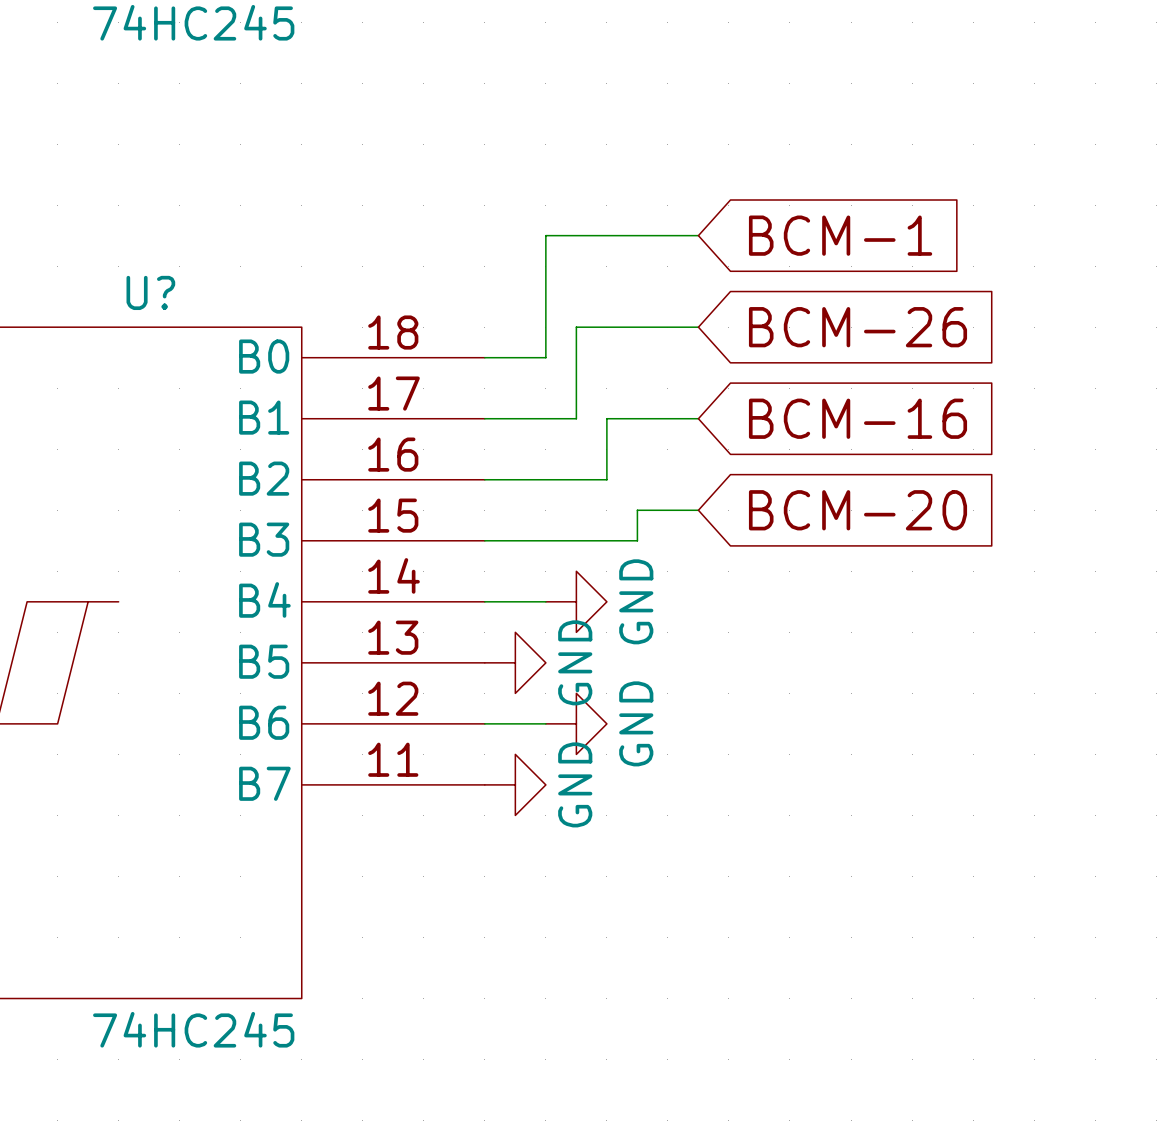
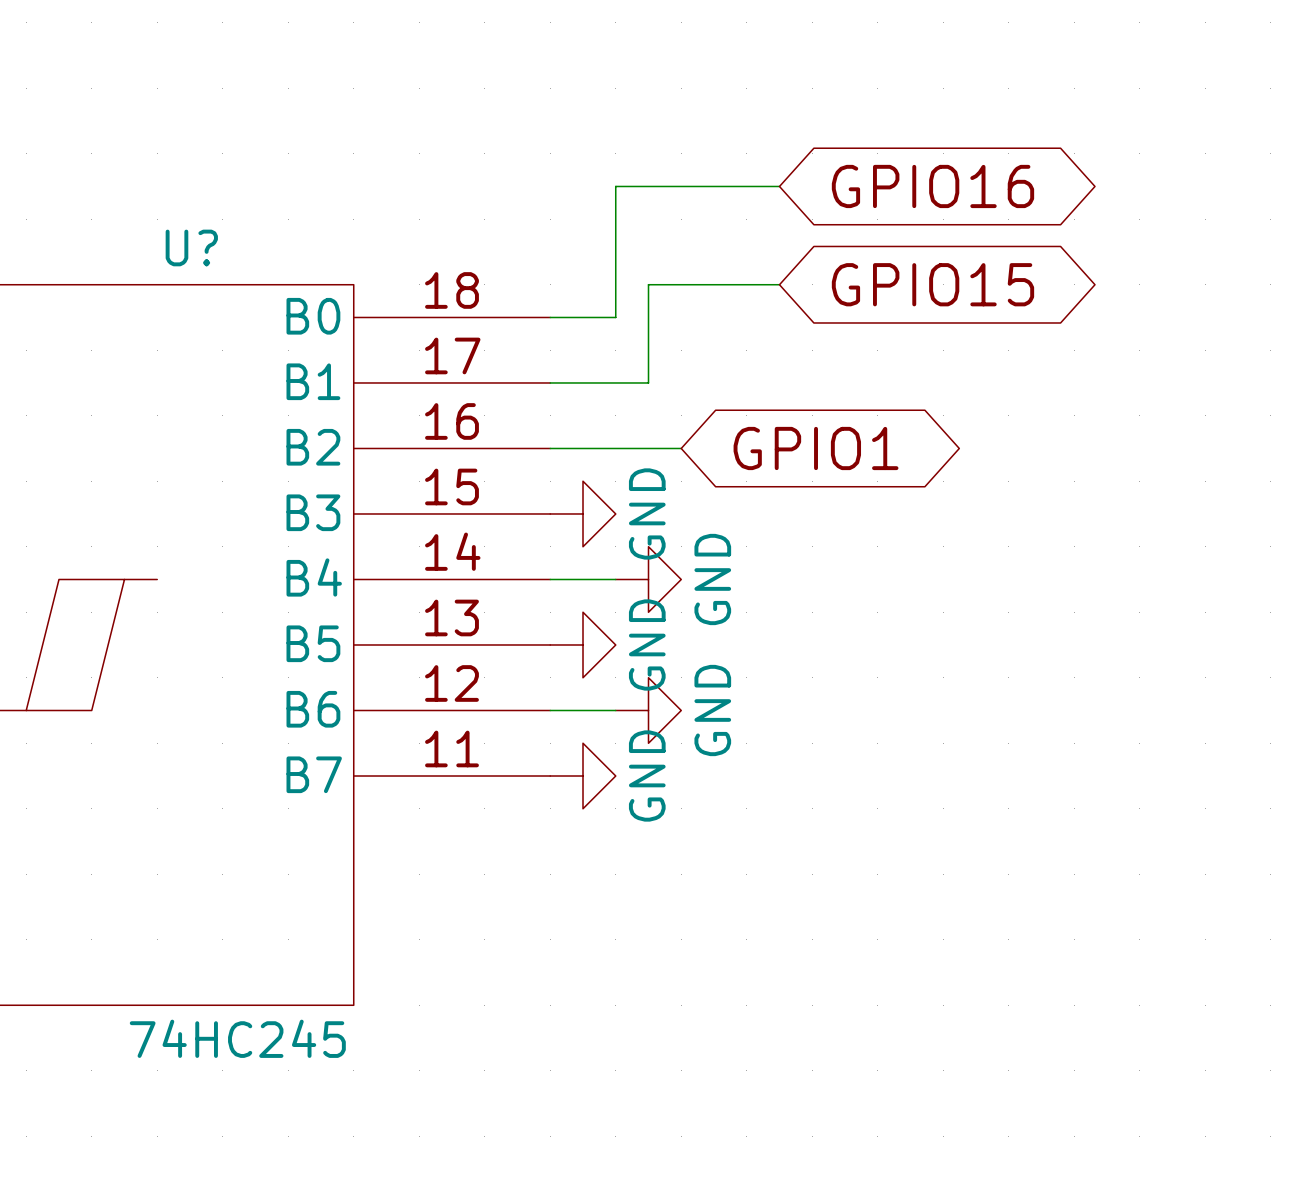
global label shape: input (840, 235) -> bidirectional (932, 186)
global label: BCM-1 (840, 235) -> GPIO16 (932, 186)
global label shape: input (858, 327) -> bidirectional (932, 284)
global label: BCM-26 (858, 327) -> GPIO15 (932, 284)
wire: (698, 418) (606, 418) (606, 479) -> none
global label: BCM-16 (858, 418) -> none
global label: none -> GPIO1 (816, 448)
wire: (698, 510) (637, 510) (637, 540) (484, 540) -> none
global label: BCM-20 (858, 510) -> none
power symbol: none -> GND (583, 513)

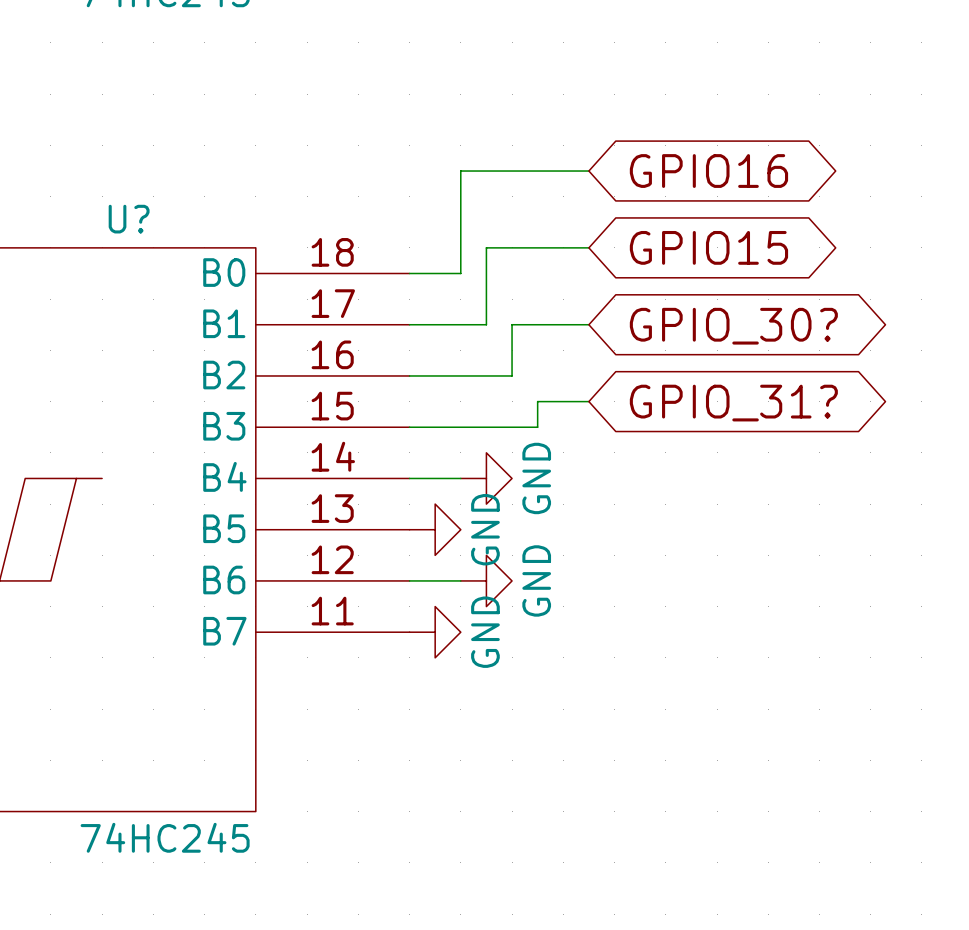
wire: none -> (588, 324) (512, 324) (512, 375)
global label: none -> GPIO_30? (733, 326)
global label: GPIO1 (816, 448) -> none
wire: none -> (588, 401) (537, 401) (537, 427) (409, 427)
global label: none -> GPIO_31? (733, 403)
power symbol: GND (583, 513) -> none

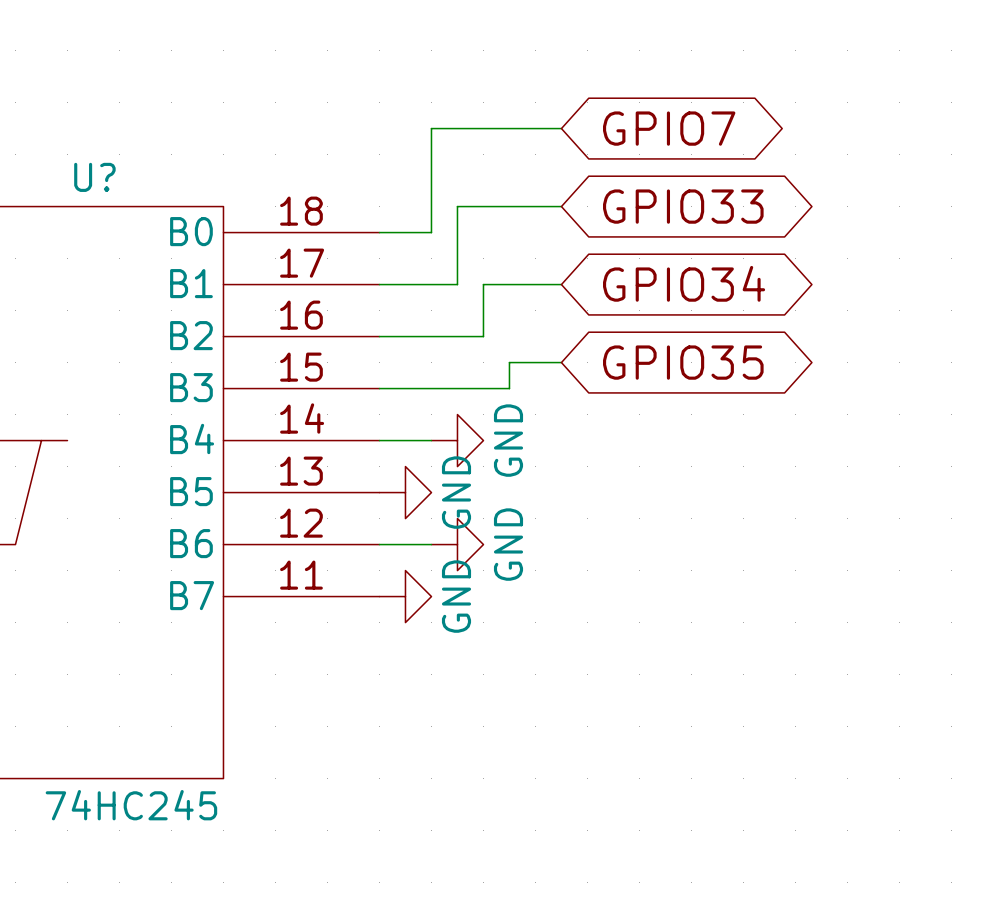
global label: GPIO16 (708, 171) -> GPIO7 (669, 128)
global label: GPIO15 (708, 247) -> GPIO33 (683, 206)
global label: GPIO_30? (733, 326) -> GPIO34 (684, 283)
global label: GPIO_31? (733, 403) -> GPIO35 (683, 362)

